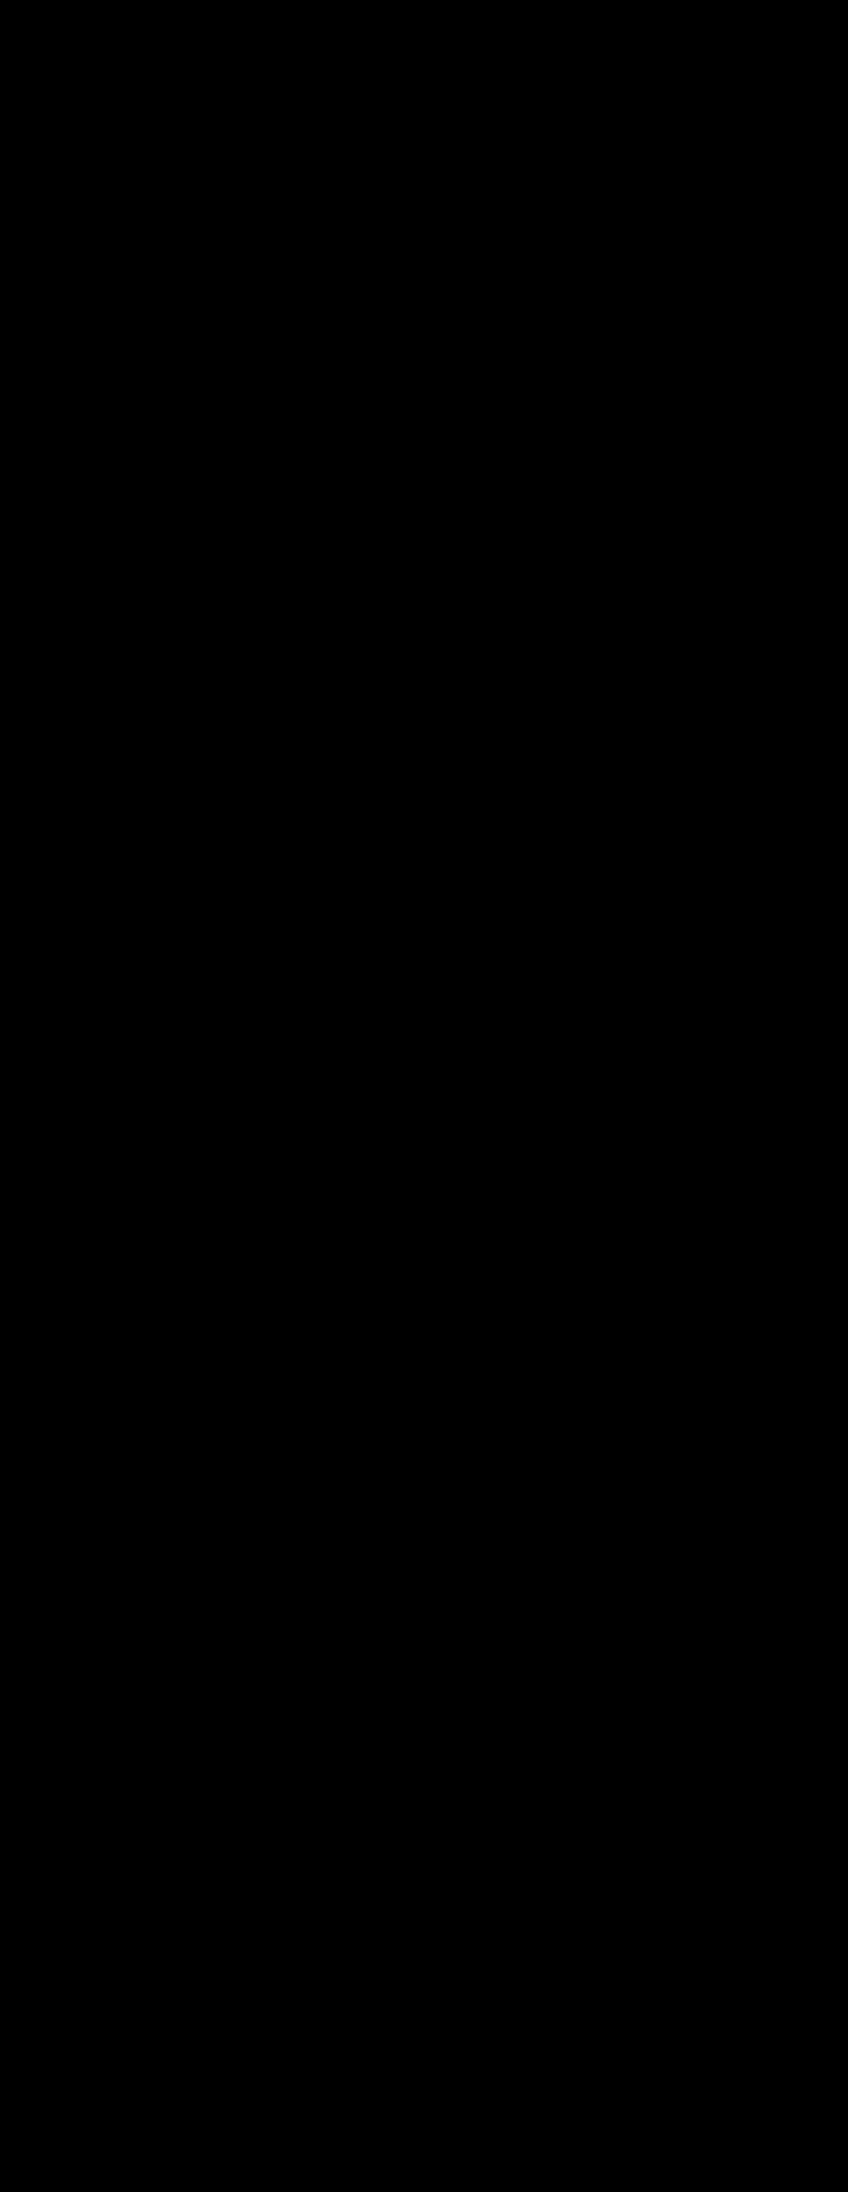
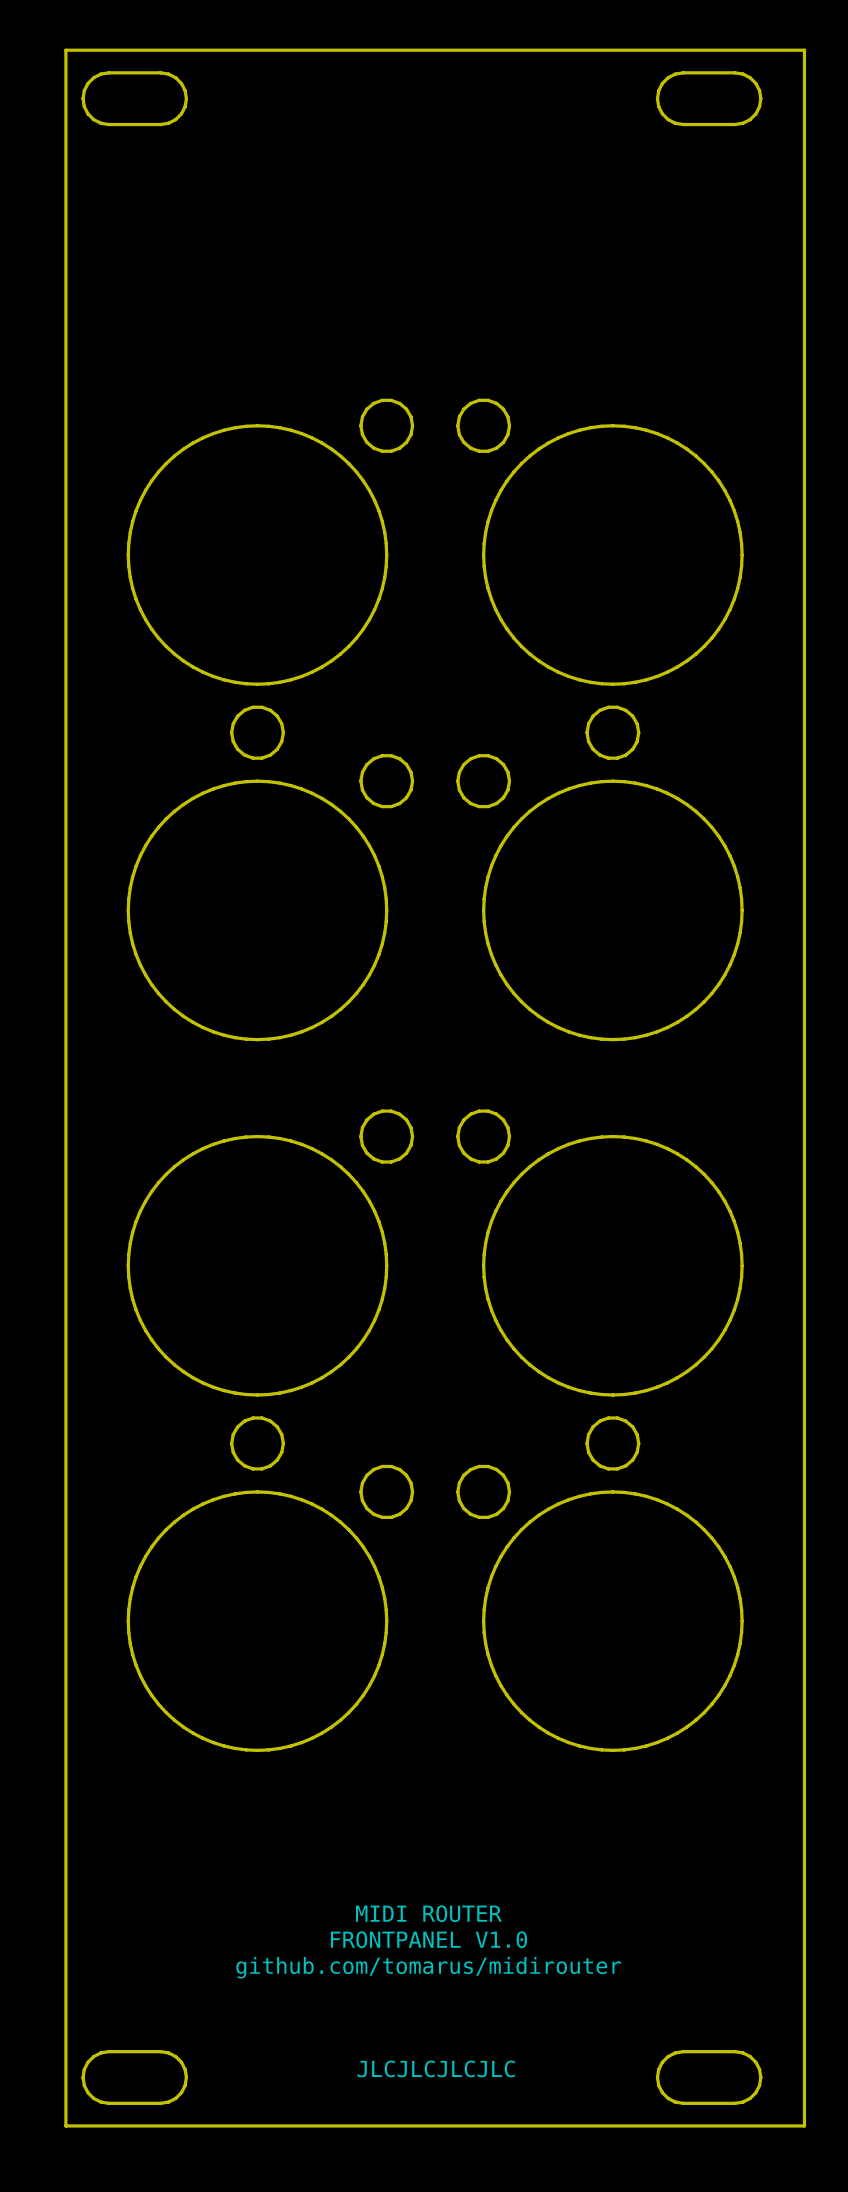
board edge: none -> (65, 50) (804, 50) (804, 2125) (65, 2125) (65, 50)
board edge: none -> (108, 72) (93, 77) (87, 83) (83, 98) (87, 113) (100, 123) (168, 123) (181, 113) (185, 106) (185, 90) (181, 83) (168, 74) (108, 72)
board edge: none -> (683, 72) (742, 74) (755, 83) (760, 98) (759, 106) (755, 113) (742, 123) (675, 123) (662, 113) (657, 98) (662, 83) (668, 77) (683, 72)
board edge: none -> (382, 400) (373, 403) (366, 409) (362, 416) (360, 425) (362, 434) (366, 442) (373, 448) (382, 451) (391, 451) (399, 448) (406, 442) (411, 434) (412, 425) (411, 416) (406, 409) (399, 403) (391, 400) (382, 400)
board edge: none -> (479, 400) (488, 400) (496, 403) (503, 409) (507, 416) (509, 425) (507, 434) (503, 442) (496, 448) (488, 451) (479, 451) (470, 448) (463, 442) (459, 434) (457, 425) (459, 416) (463, 409) (470, 403) (479, 400)
board edge: none -> (257, 425) (235, 427) (213, 433) (183, 449) (166, 463) (151, 480) (140, 500) (132, 521) (128, 555) (132, 588) (140, 609) (151, 629) (166, 646) (183, 660) (202, 672) (235, 682) (257, 684) (279, 682) (312, 672) (331, 660) (348, 646) (363, 629) (374, 609) (384, 577) (386, 555) (384, 532) (374, 500) (363, 480) (348, 463) (331, 449) (301, 433) (279, 427) (257, 425)
board edge: none -> (612, 425) (590, 427) (568, 433) (538, 449) (521, 463) (507, 480) (495, 500) (488, 521) (483, 555) (488, 588) (495, 609) (507, 629) (521, 646) (538, 660) (558, 672) (590, 682) (612, 684) (635, 682) (667, 672) (687, 660) (704, 646) (718, 629) (730, 609) (737, 588) (742, 555) (740, 532) (734, 510) (718, 480) (704, 463) (687, 449) (657, 433) (635, 427) (612, 425)
board edge: none -> (253, 707) (244, 710) (237, 716) (233, 723) (231, 732) (233, 741) (237, 749) (244, 755) (253, 758) (261, 758) (270, 755) (277, 749) (281, 741) (283, 732) (281, 723) (277, 716) (270, 710) (261, 707) (253, 707)
board edge: none -> (608, 707) (617, 707) (625, 710) (632, 716) (637, 723) (638, 732) (637, 741) (632, 749) (625, 755) (617, 758) (608, 758) (599, 755) (593, 749) (588, 741) (587, 732) (588, 723) (593, 716) (599, 710) (608, 707)
board edge: none -> (382, 755) (373, 758) (366, 764) (362, 772) (360, 781) (362, 790) (366, 797) (373, 803) (382, 806) (391, 806) (399, 803) (406, 797) (411, 790) (412, 781) (411, 772) (406, 764) (399, 758) (391, 755) (382, 755)
board edge: none -> (479, 755) (488, 755) (496, 758) (503, 764) (507, 772) (509, 781) (507, 790) (503, 797) (496, 803) (488, 806) (479, 806) (470, 803) (463, 797) (459, 790) (457, 781) (459, 772) (463, 764) (470, 758) (479, 755)
board edge: none -> (257, 781) (235, 783) (202, 793) (183, 804) (166, 819) (151, 836) (140, 855) (132, 876) (128, 910) (132, 943) (140, 965) (151, 984) (166, 1001) (183, 1016) (202, 1027) (235, 1037) (257, 1039) (279, 1037) (312, 1027) (331, 1016) (348, 1001) (363, 984) (374, 965) (384, 932) (386, 910) (384, 887) (374, 855) (363, 836) (348, 819) (331, 804) (312, 793) (279, 783) (257, 781)
board edge: none -> (612, 781) (590, 783) (558, 793) (538, 804) (521, 819) (507, 836) (495, 855) (488, 876) (483, 910) (488, 943) (495, 965) (507, 984) (521, 1001) (538, 1016) (558, 1027) (590, 1037) (612, 1039) (635, 1037) (667, 1027) (687, 1016) (704, 1001) (718, 984) (730, 965) (737, 943) (742, 910) (740, 887) (734, 866) (718, 836) (704, 819) (687, 804) (667, 793) (635, 783) (612, 781)
board edge: none -> (382, 1111) (391, 1111) (399, 1114) (406, 1119) (411, 1127) (412, 1136) (411, 1145) (406, 1153) (399, 1158) (391, 1162) (382, 1162) (373, 1158) (366, 1153) (362, 1145) (360, 1136) (362, 1127) (366, 1119) (373, 1114) (382, 1111)
board edge: none -> (479, 1111) (470, 1114) (463, 1119) (459, 1127) (457, 1136) (459, 1145) (463, 1153) (470, 1158) (479, 1162) (488, 1162) (496, 1158) (503, 1153) (507, 1145) (509, 1136) (507, 1127) (503, 1119) (496, 1114) (488, 1111) (479, 1111)
board edge: none -> (257, 1136) (235, 1138) (202, 1148) (183, 1159) (166, 1174) (151, 1191) (140, 1211) (132, 1232) (128, 1265) (132, 1299) (140, 1320) (151, 1339) (166, 1357) (183, 1371) (202, 1382) (235, 1393) (257, 1395) (279, 1393) (312, 1382) (331, 1371) (348, 1357) (363, 1339) (374, 1320) (384, 1288) (386, 1265) (384, 1243) (374, 1211) (363, 1191) (348, 1174) (331, 1159) (312, 1148) (279, 1138) (257, 1136)
board edge: none -> (612, 1136) (590, 1138) (558, 1148) (538, 1159) (521, 1174) (507, 1191) (495, 1211) (488, 1232) (483, 1265) (488, 1299) (495, 1320) (507, 1339) (521, 1357) (538, 1371) (558, 1382) (590, 1393) (612, 1395) (635, 1393) (667, 1382) (687, 1371) (704, 1357) (718, 1339) (730, 1320) (737, 1299) (742, 1265) (740, 1243) (734, 1221) (718, 1191) (704, 1174) (687, 1159) (667, 1148) (635, 1138) (612, 1136)
board edge: none -> (253, 1418) (261, 1418) (270, 1421) (277, 1426) (281, 1434) (283, 1443) (281, 1452) (277, 1460) (270, 1465) (261, 1468) (253, 1468) (244, 1465) (237, 1460) (233, 1452) (231, 1443) (233, 1434) (237, 1426) (244, 1421) (253, 1418)
board edge: none -> (608, 1418) (599, 1421) (593, 1426) (588, 1434) (587, 1443) (588, 1452) (593, 1460) (599, 1465) (608, 1468) (617, 1468) (625, 1465) (632, 1460) (637, 1452) (638, 1443) (637, 1434) (632, 1426) (625, 1421) (617, 1418) (608, 1418)
board edge: none -> (382, 1466) (391, 1466) (399, 1469) (406, 1475) (411, 1483) (412, 1491) (411, 1500) (406, 1508) (399, 1514) (391, 1517) (382, 1517) (373, 1514) (366, 1508) (362, 1500) (360, 1491) (362, 1483) (366, 1475) (373, 1469) (382, 1466)
board edge: none -> (479, 1466) (470, 1469) (463, 1475) (459, 1483) (457, 1491) (459, 1500) (463, 1508) (470, 1514) (479, 1517) (488, 1517) (496, 1514) (503, 1508) (507, 1500) (509, 1491) (507, 1483) (503, 1475) (496, 1469) (488, 1466) (479, 1466)
board edge: none -> (257, 1491) (235, 1493) (202, 1504) (183, 1515) (166, 1529) (151, 1547) (140, 1566) (132, 1587) (128, 1621) (132, 1654) (140, 1675) (151, 1695) (166, 1712) (183, 1727) (202, 1738) (235, 1748) (257, 1750) (279, 1748) (312, 1738) (331, 1727) (348, 1712) (363, 1695) (374, 1675) (384, 1643) (386, 1621) (384, 1598) (374, 1566) (363, 1547) (348, 1529) (331, 1515) (312, 1504) (279, 1493) (257, 1491)
board edge: none -> (612, 1491) (590, 1493) (558, 1504) (538, 1515) (521, 1529) (507, 1547) (495, 1566) (488, 1587) (483, 1621) (488, 1654) (495, 1675) (507, 1695) (521, 1712) (538, 1727) (558, 1738) (590, 1748) (612, 1750) (635, 1748) (667, 1738) (687, 1727) (704, 1712) (718, 1695) (730, 1675) (737, 1654) (742, 1621) (740, 1598) (734, 1576) (718, 1547) (704, 1529) (687, 1515) (667, 1504) (635, 1493) (612, 1491)
text: none -> MIDI ROUTER (428, 1913)
text: none -> FRONTPANEL V1.0 (428, 1939)
text: none -> github.com/tomarus/midirouter (428, 1967)
board edge: none -> (108, 2051) (168, 2052) (175, 2056) (185, 2069) (185, 2085) (175, 2098) (168, 2102) (100, 2102) (93, 2098) (84, 2085) (84, 2069) (93, 2056) (108, 2051)
board edge: none -> (683, 2051) (668, 2056) (662, 2062) (657, 2077) (662, 2092) (675, 2102) (742, 2102) (755, 2092) (759, 2085) (759, 2069) (750, 2056) (742, 2052) (683, 2051)
text: none -> JLCJLCJLCJLC (436, 2068)

